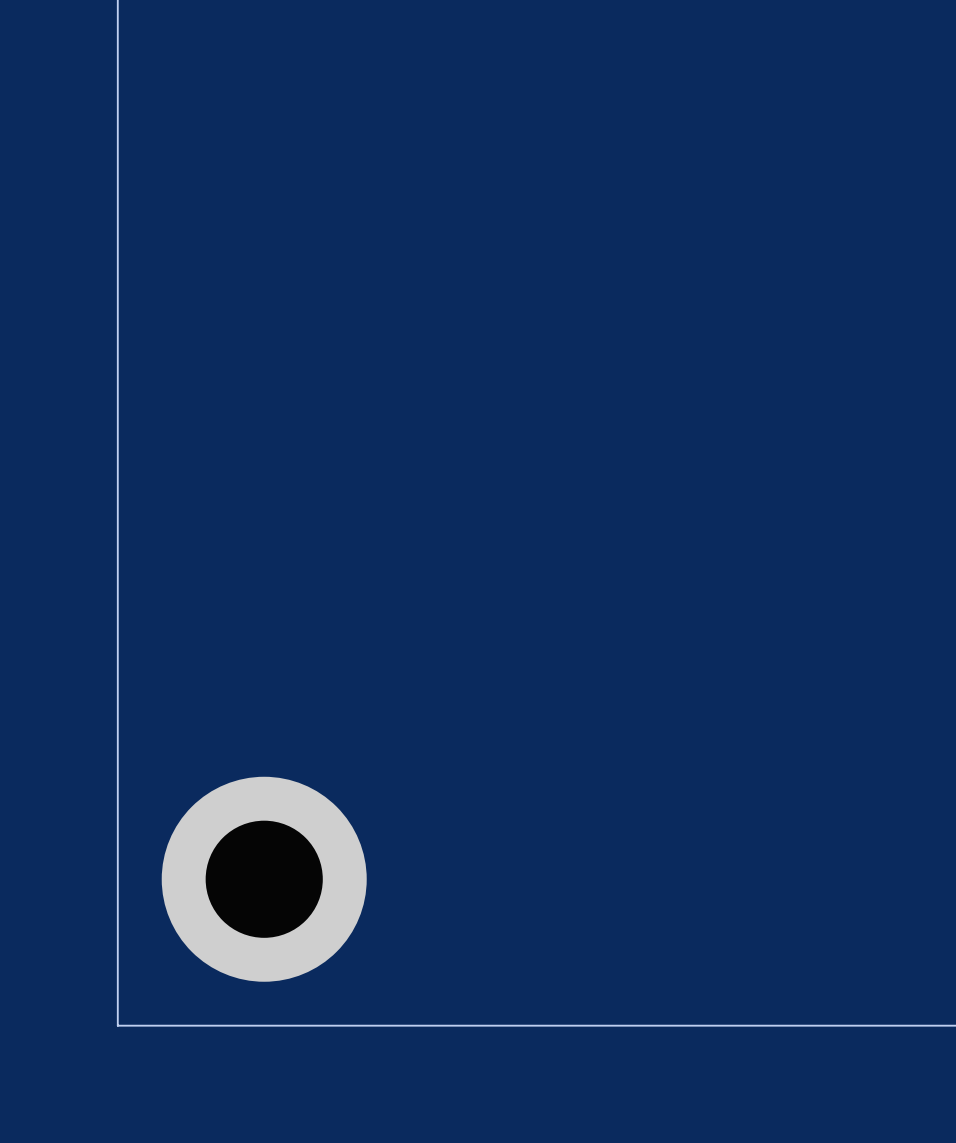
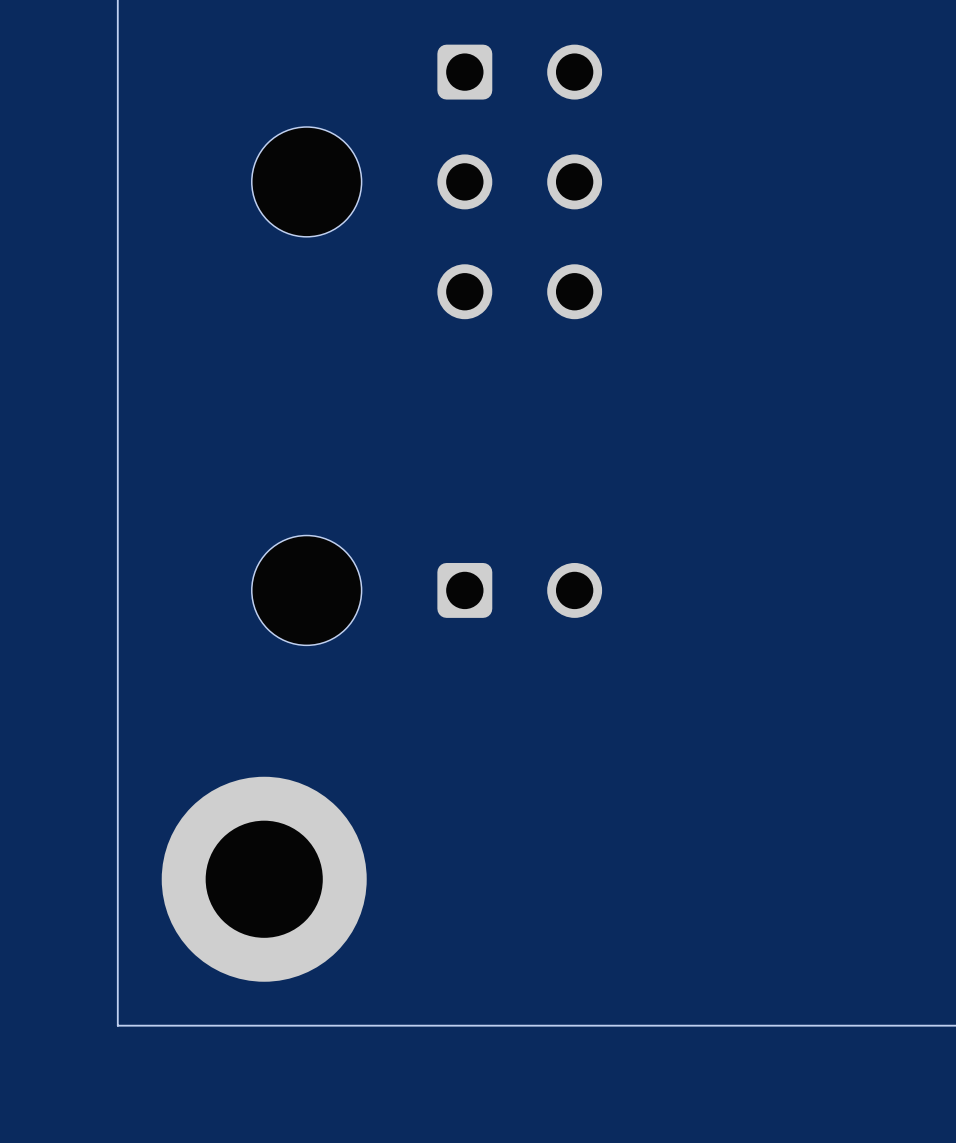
part: none -> (426, 181)
part: none -> (426, 590)

